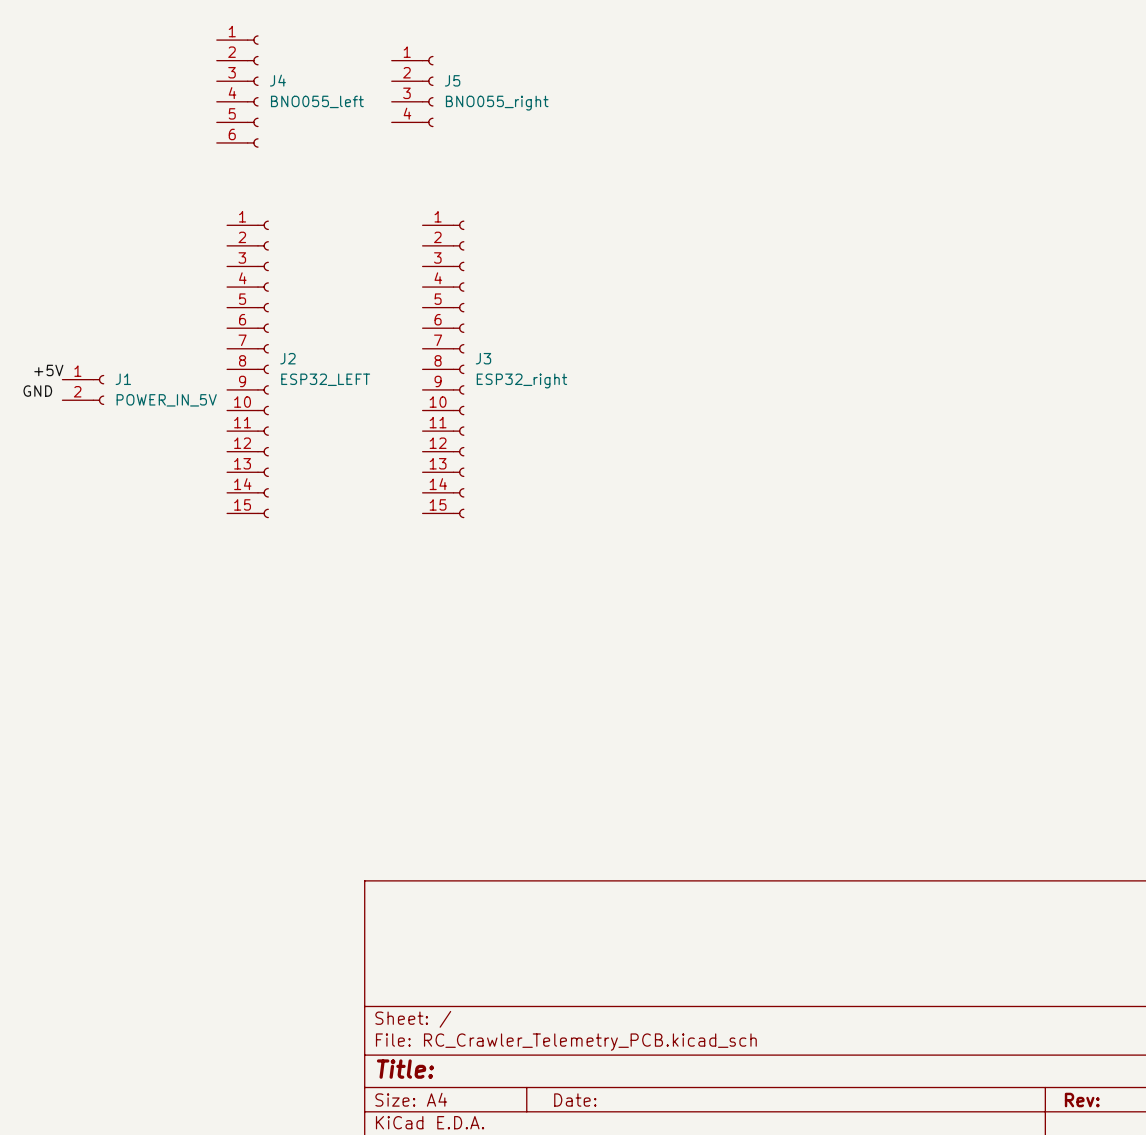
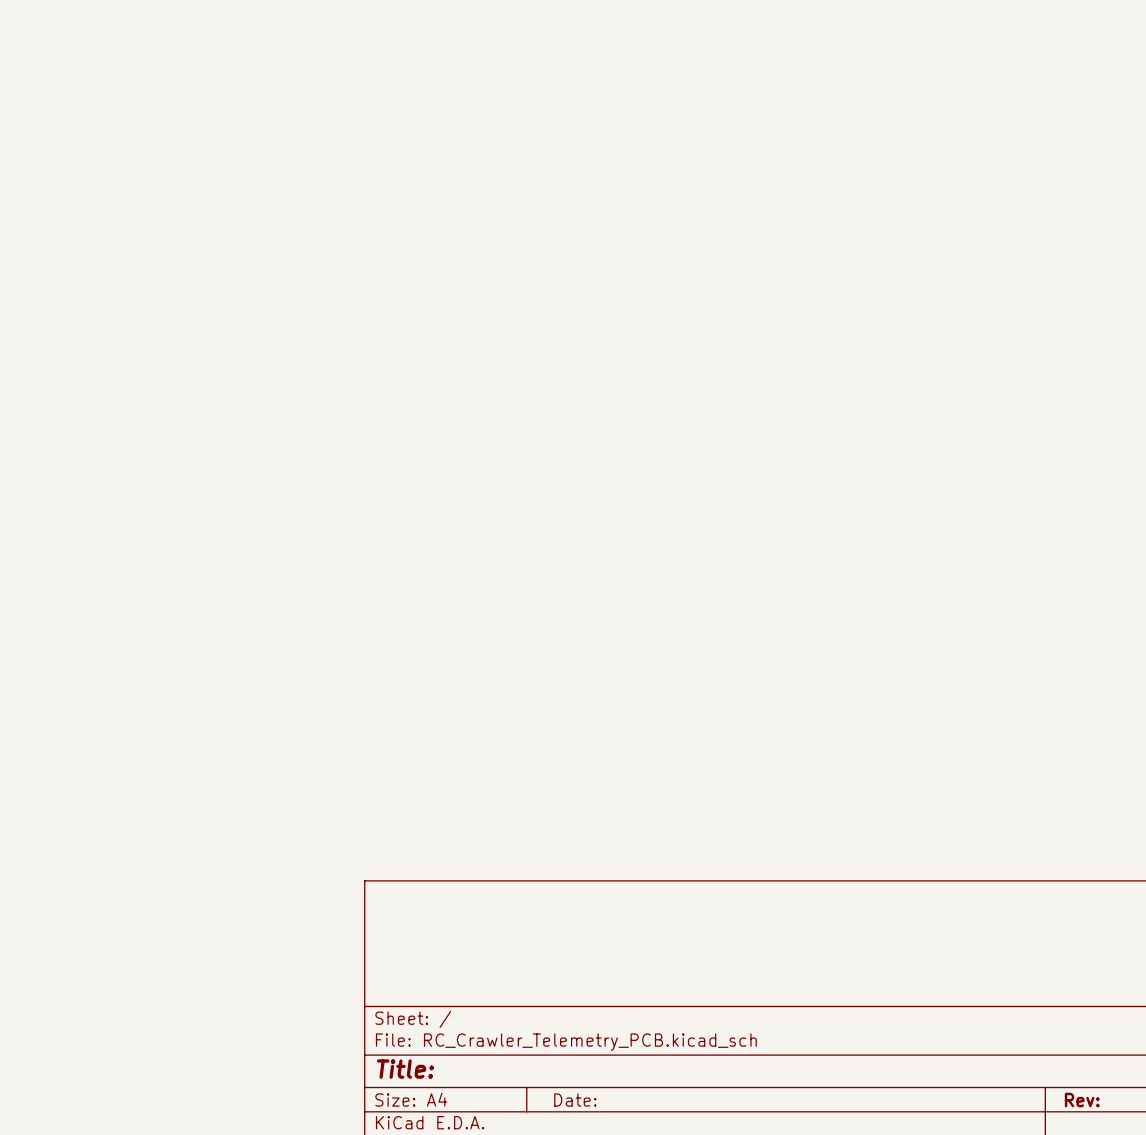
J4: BNO055_left (237, 91) -> none
J5: BNO055_right (412, 91) -> none
J2: ESP32_LEFT (248, 369) -> none
J3: ESP32_right (443, 369) -> none
label: +5V (48, 370) -> none
J1: POWER_IN_5V (83, 389) -> none
label: GND (37, 391) -> none

